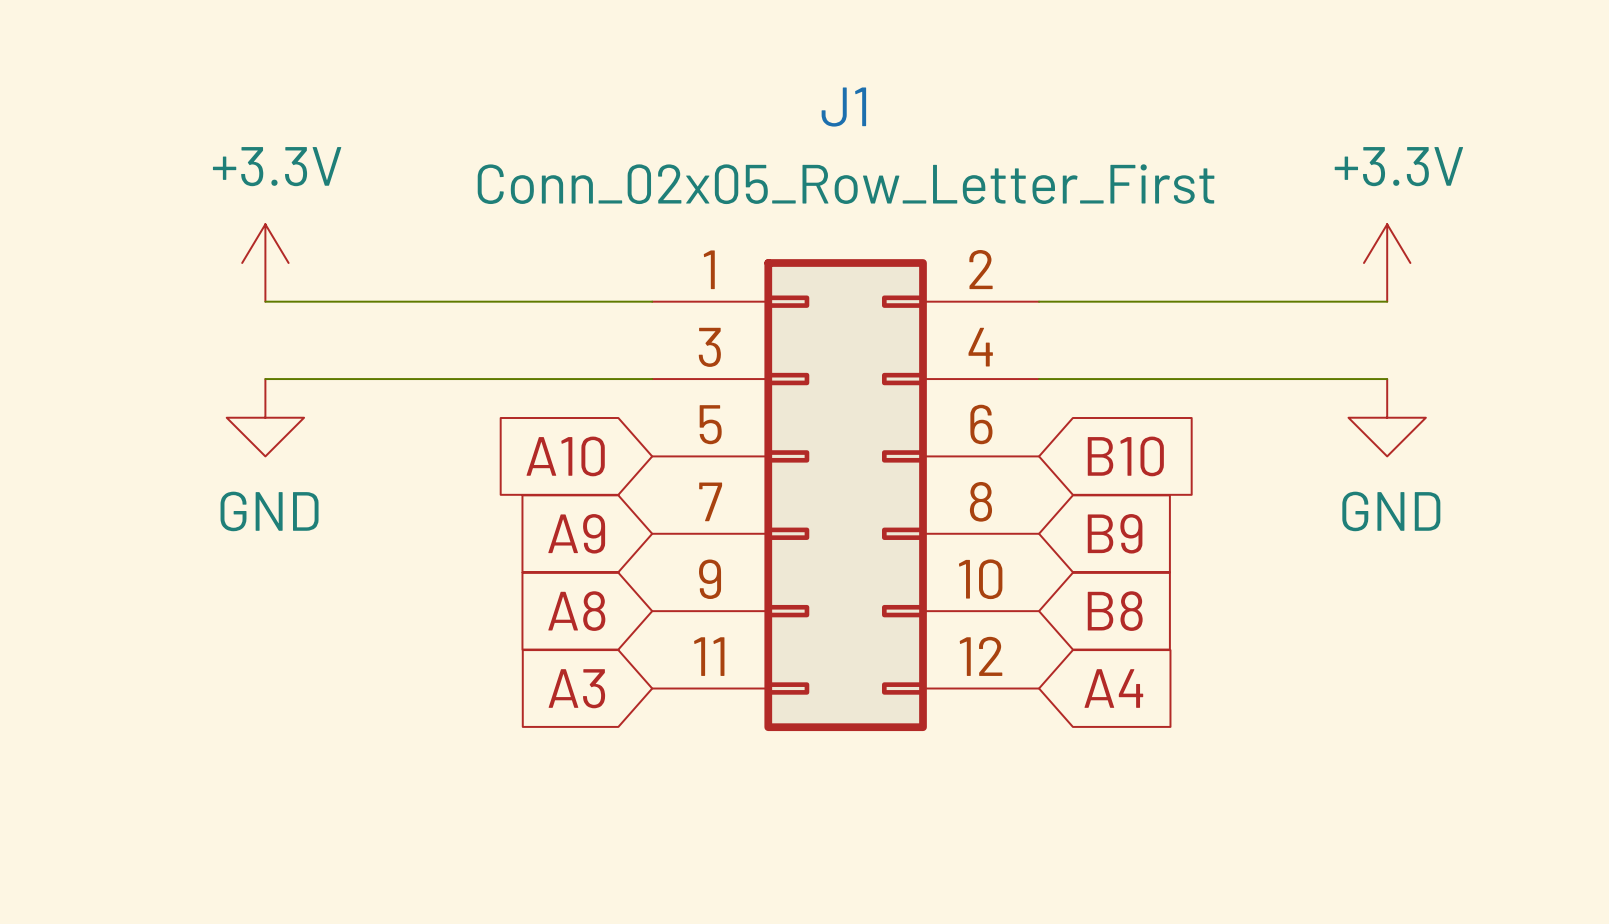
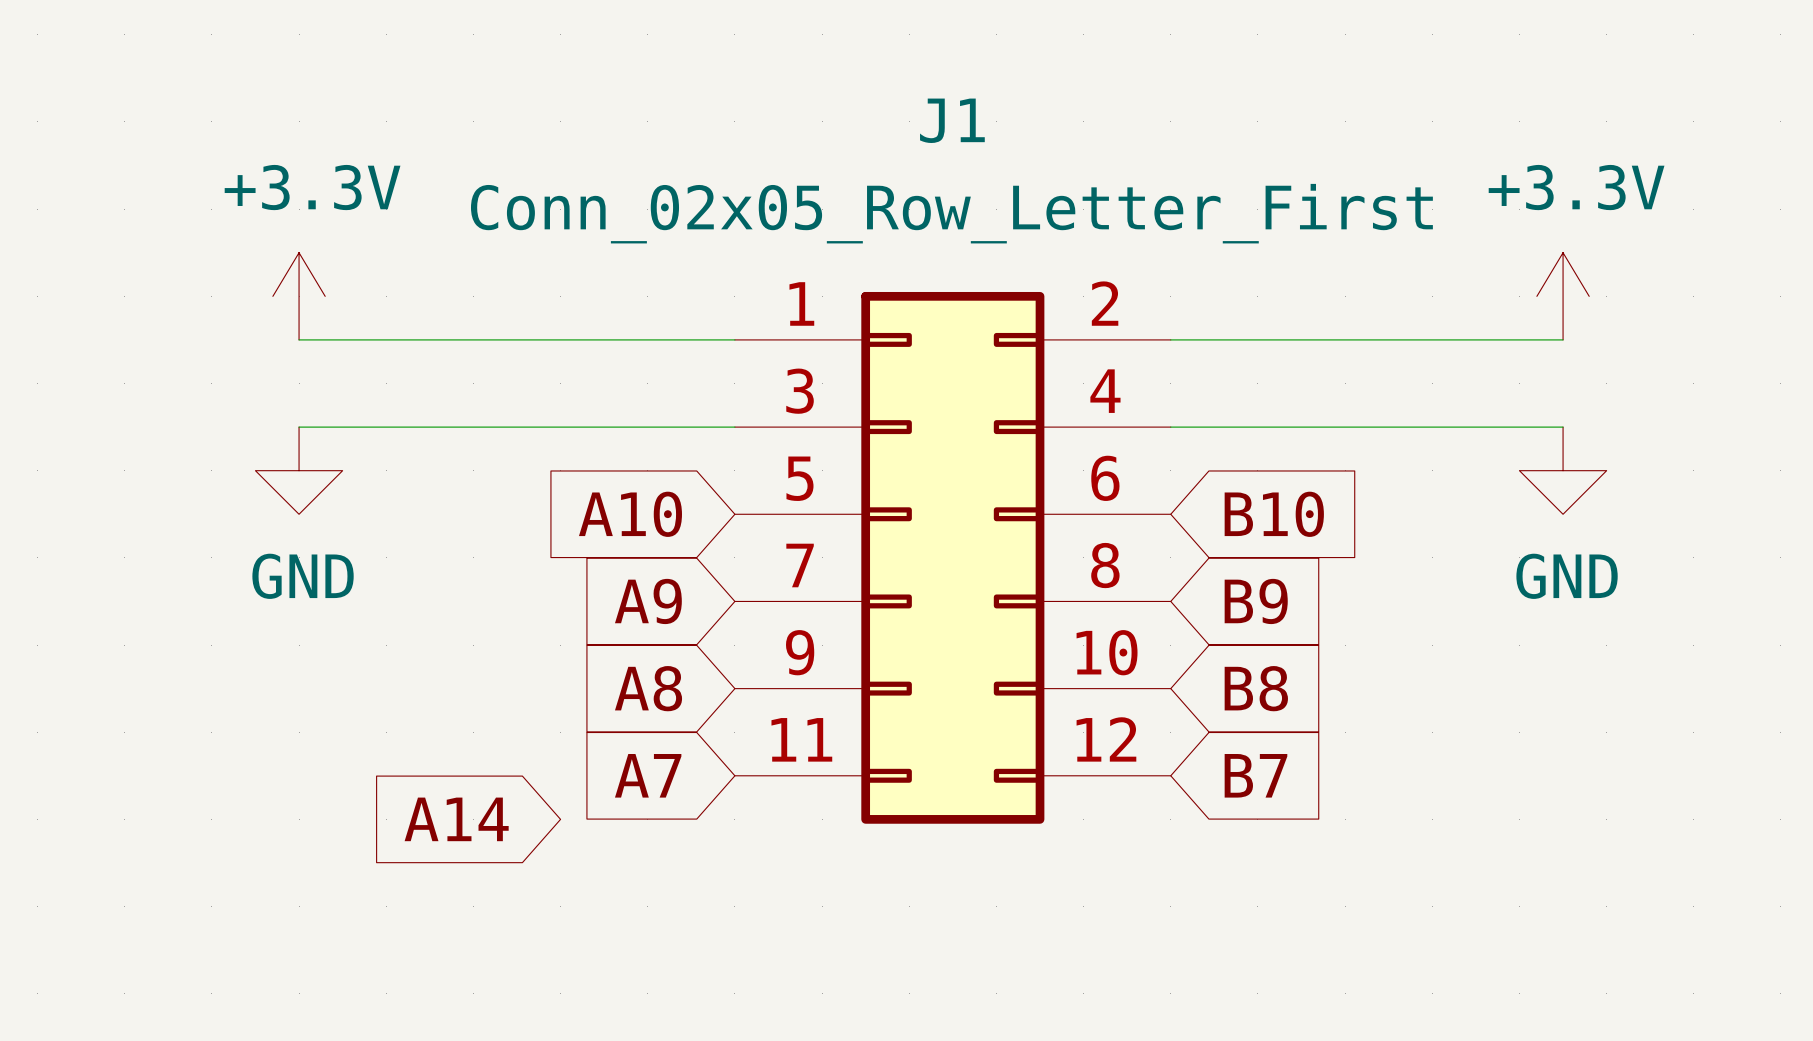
global label: A3 (576, 688) -> A7 (648, 775)
global label: A4 (1113, 688) -> B7 (1255, 775)
global label: none -> A14 (456, 819)

